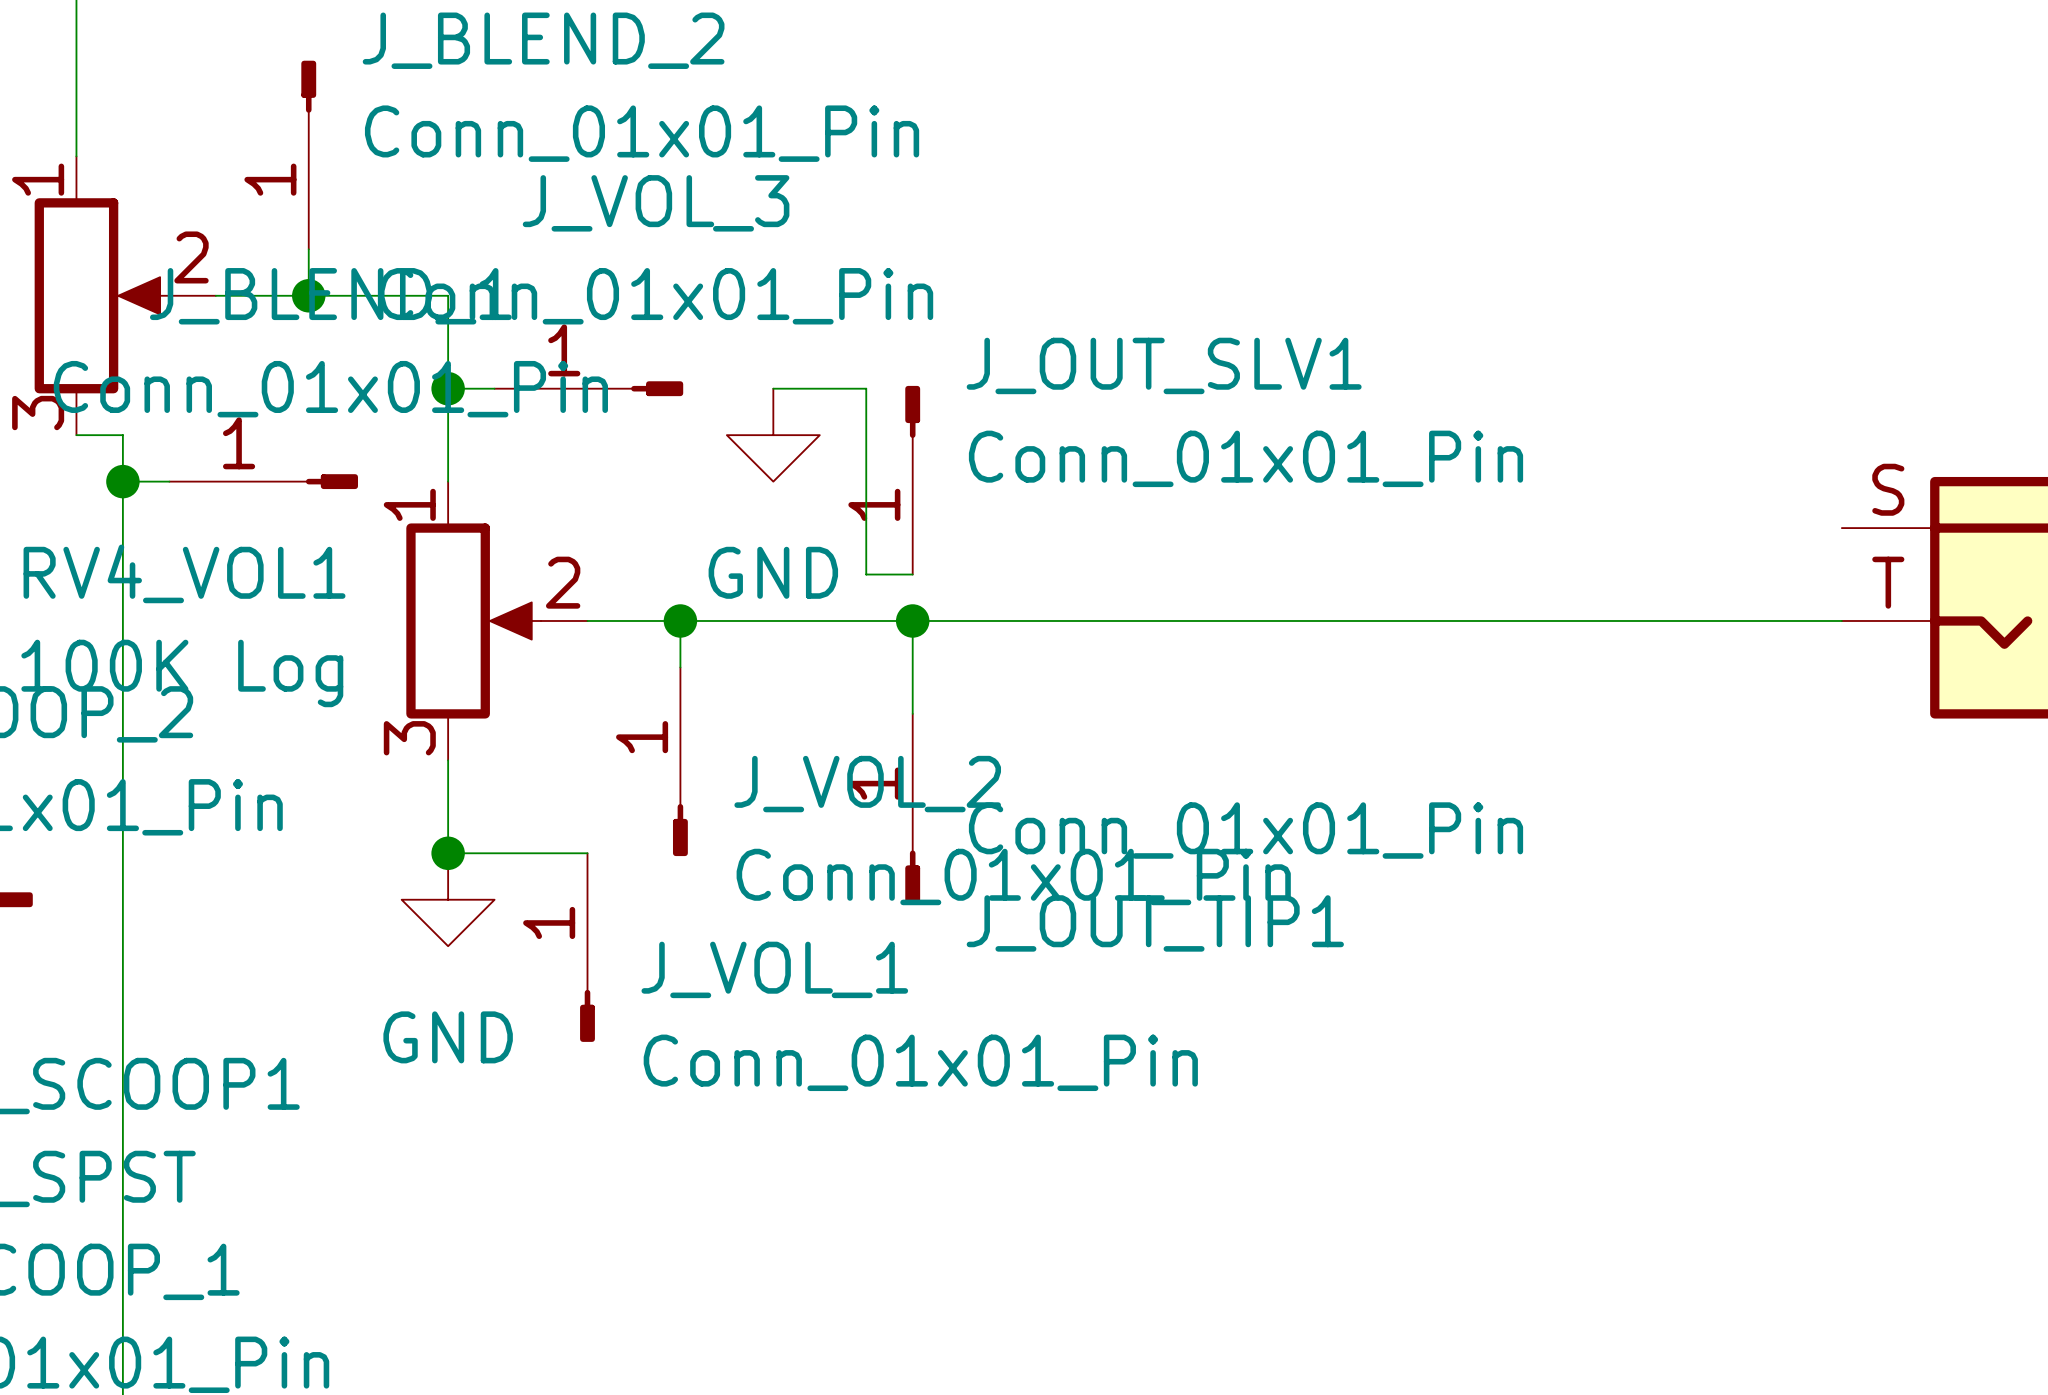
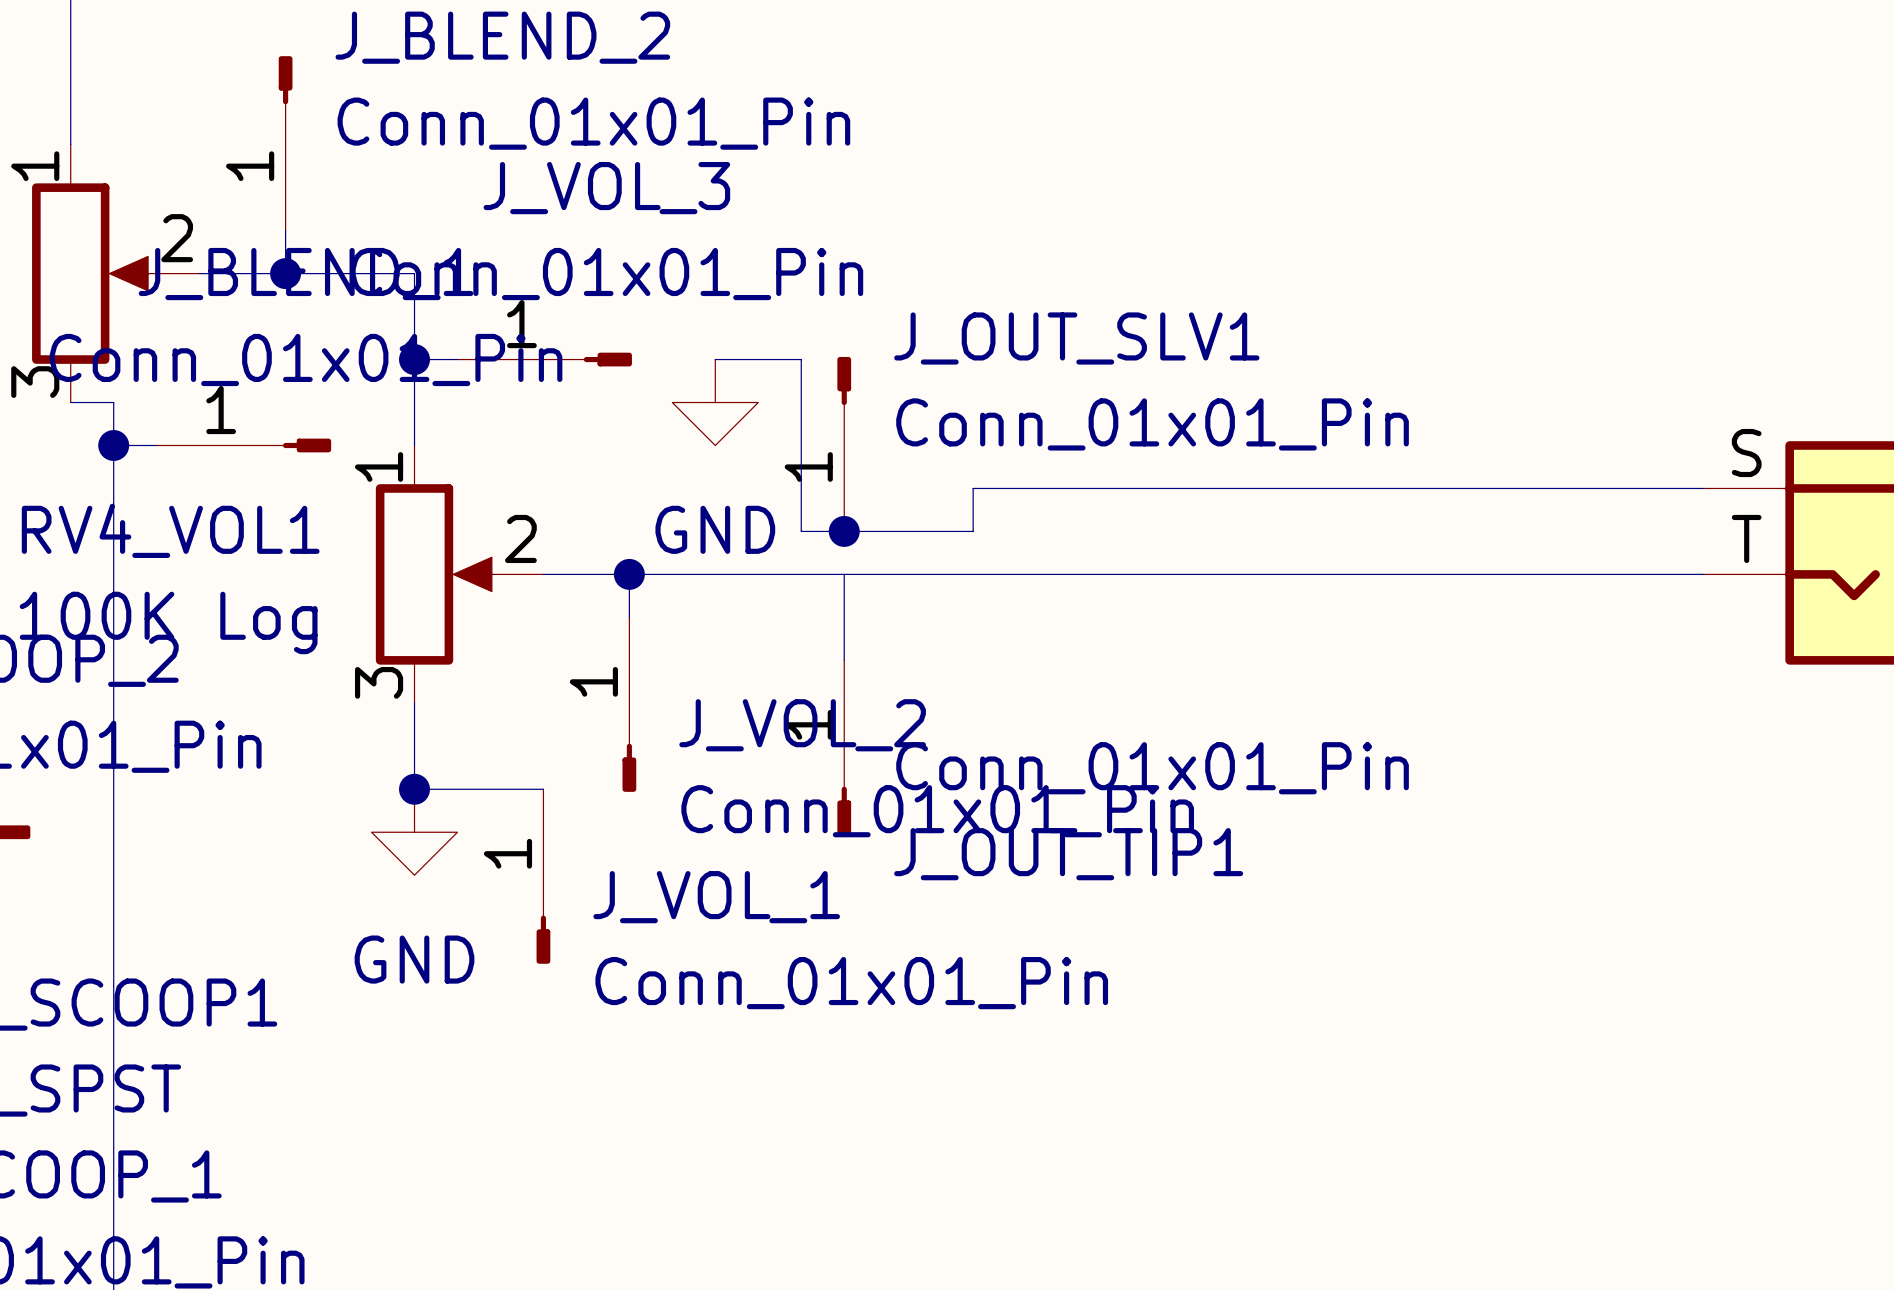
wire: none -> (1703, 488) (973, 488) (973, 531) (844, 531)
junction position: (912, 620) -> (844, 531)

